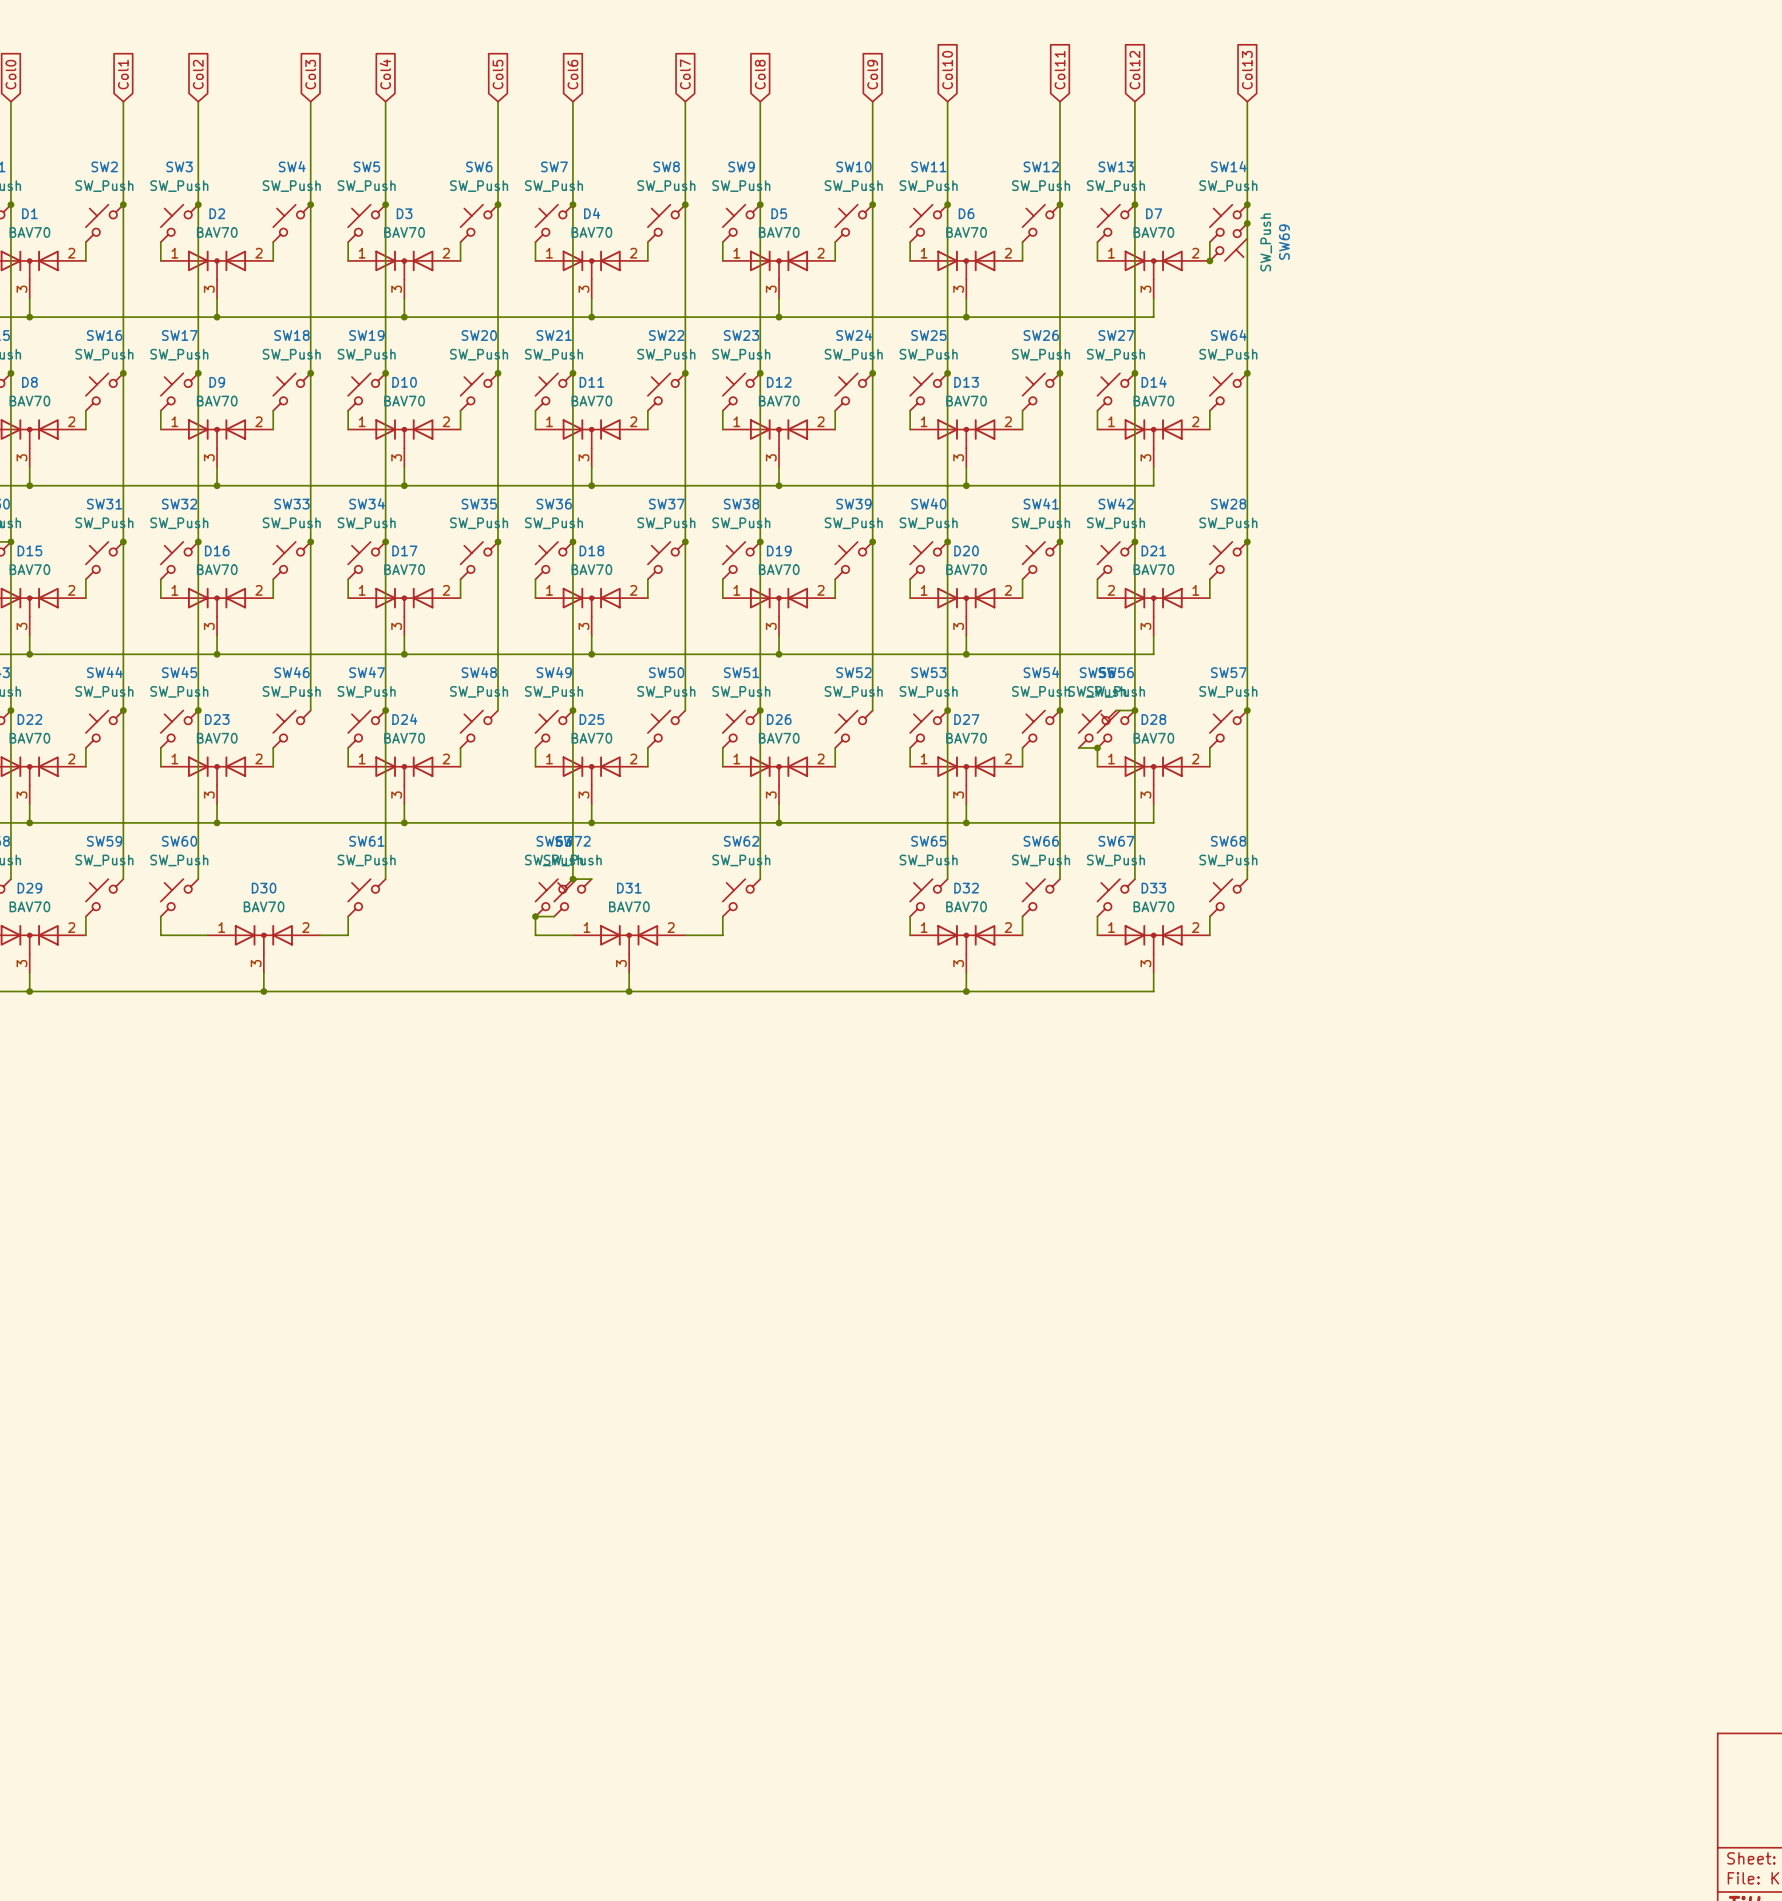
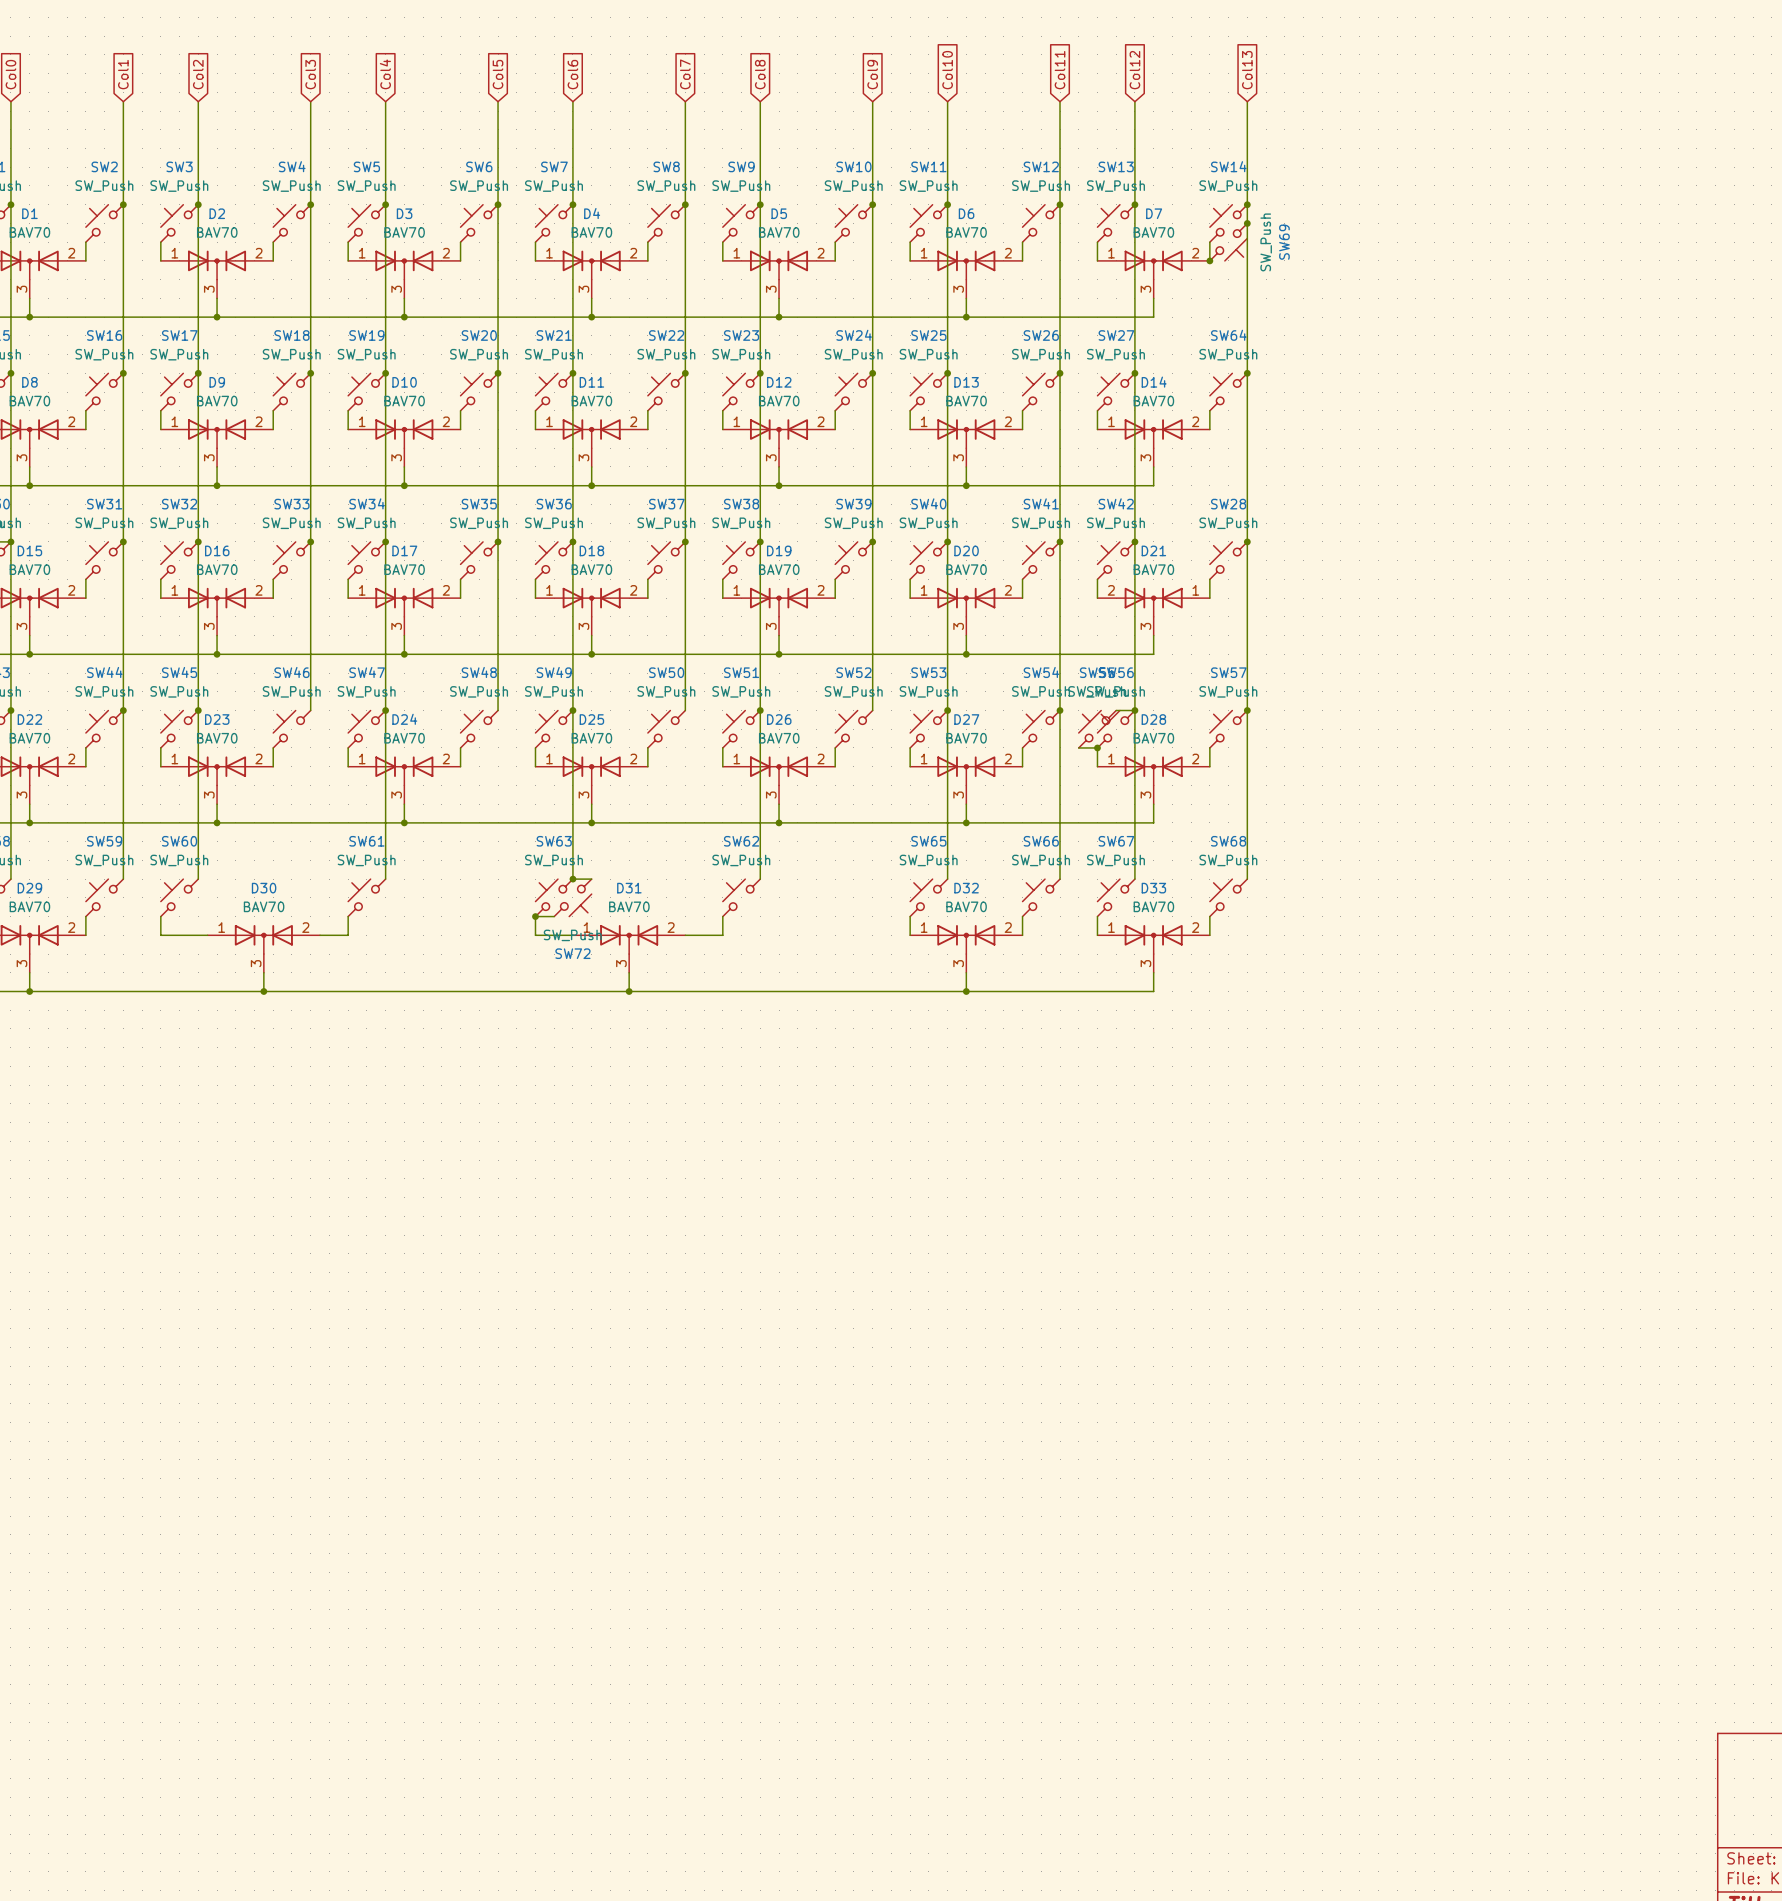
SW72 rotation: 0° (572, 897) -> 180° (572, 897)

